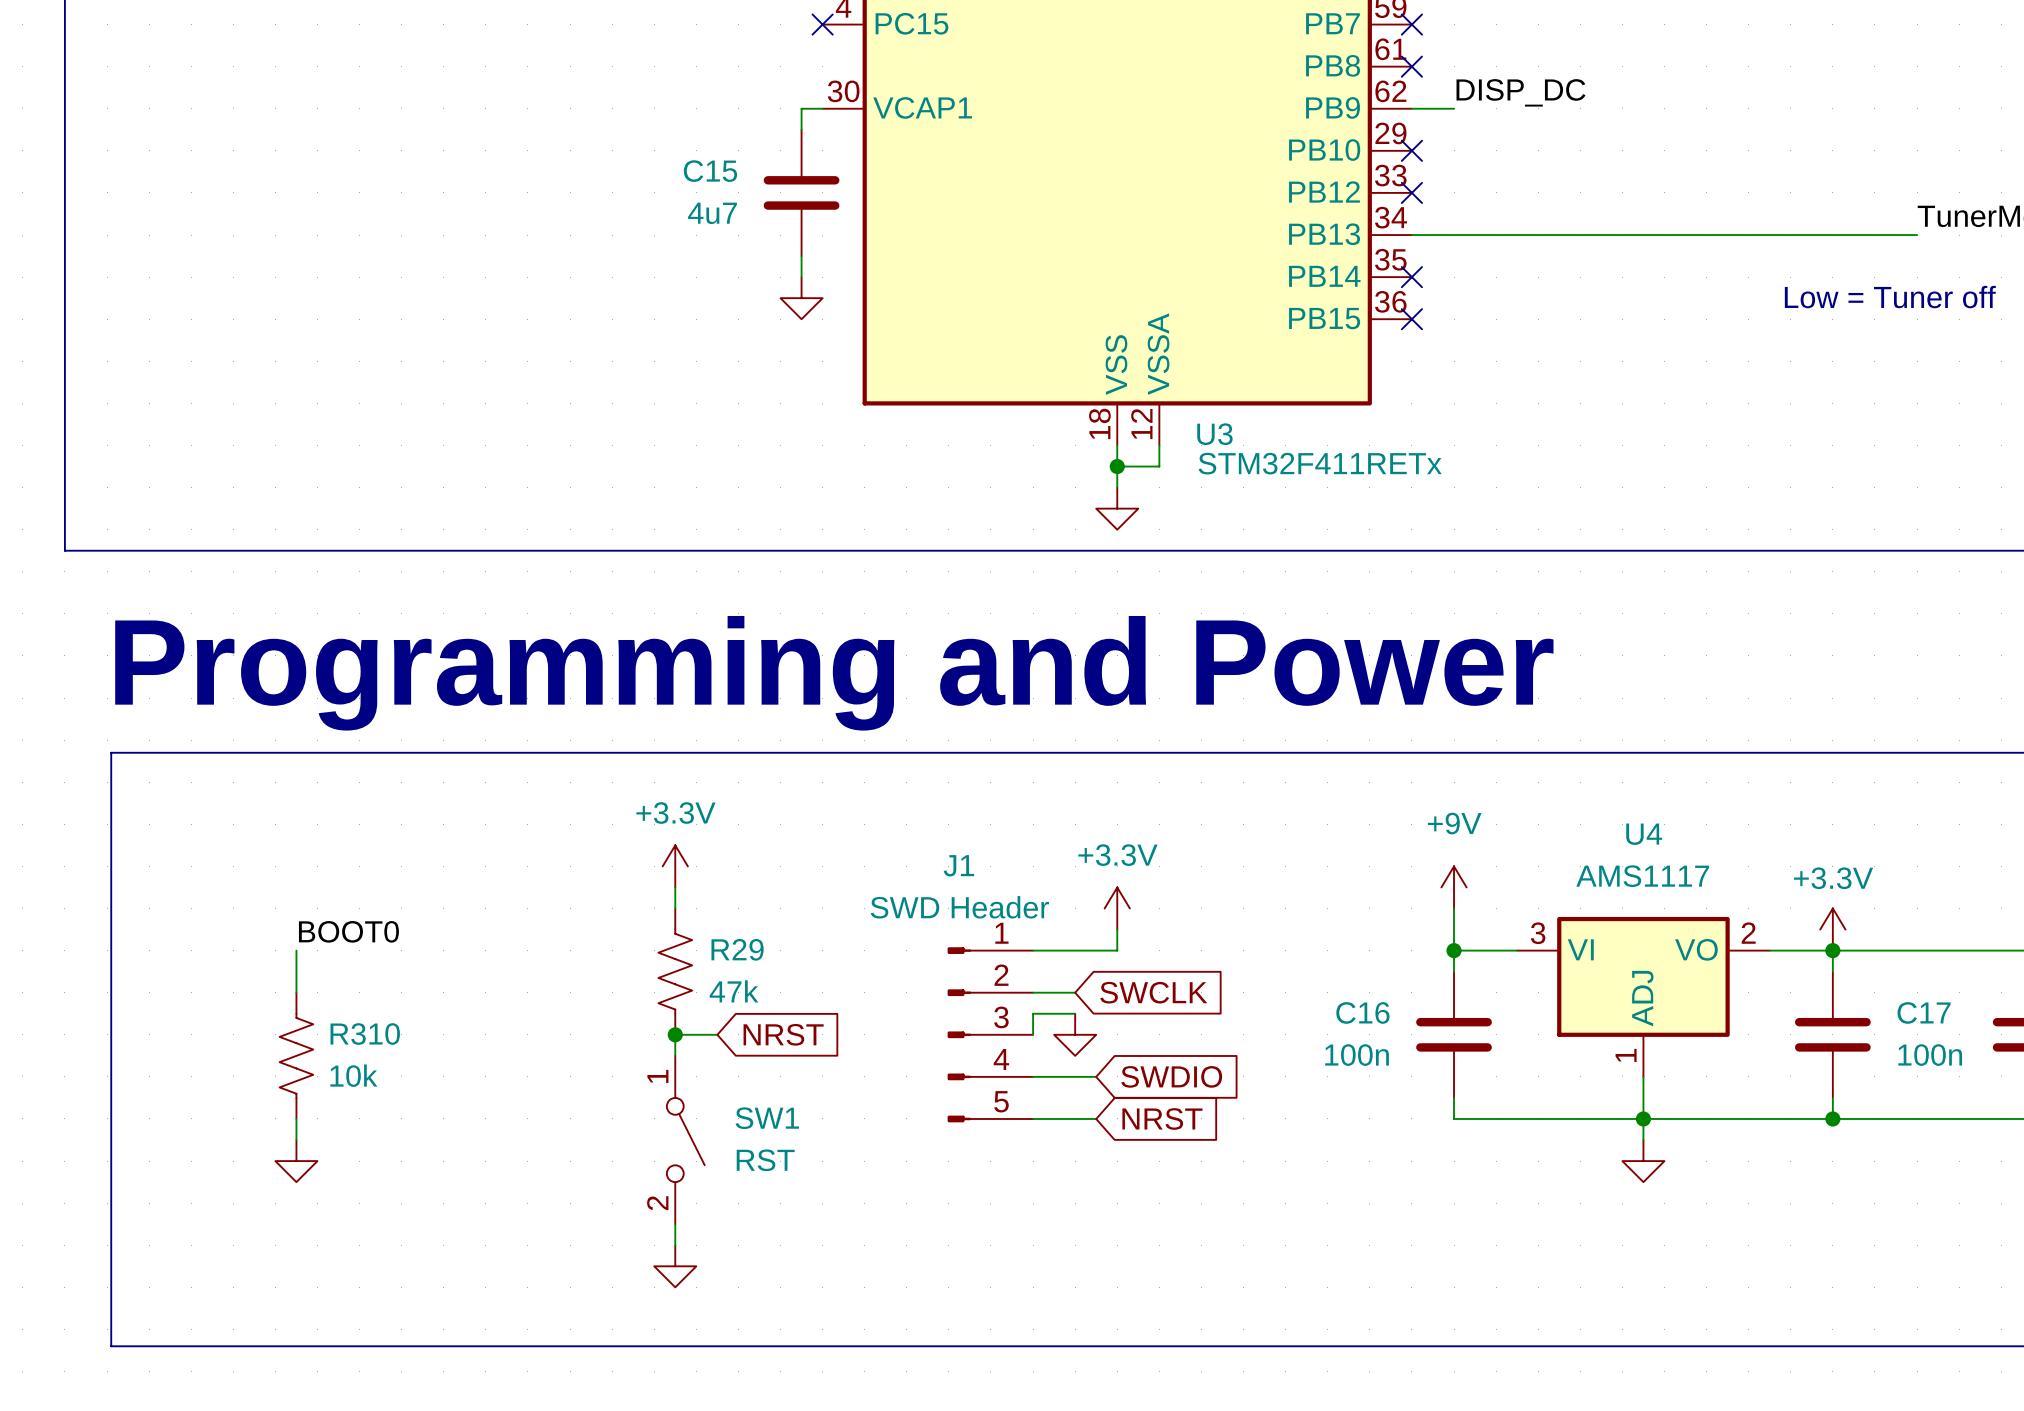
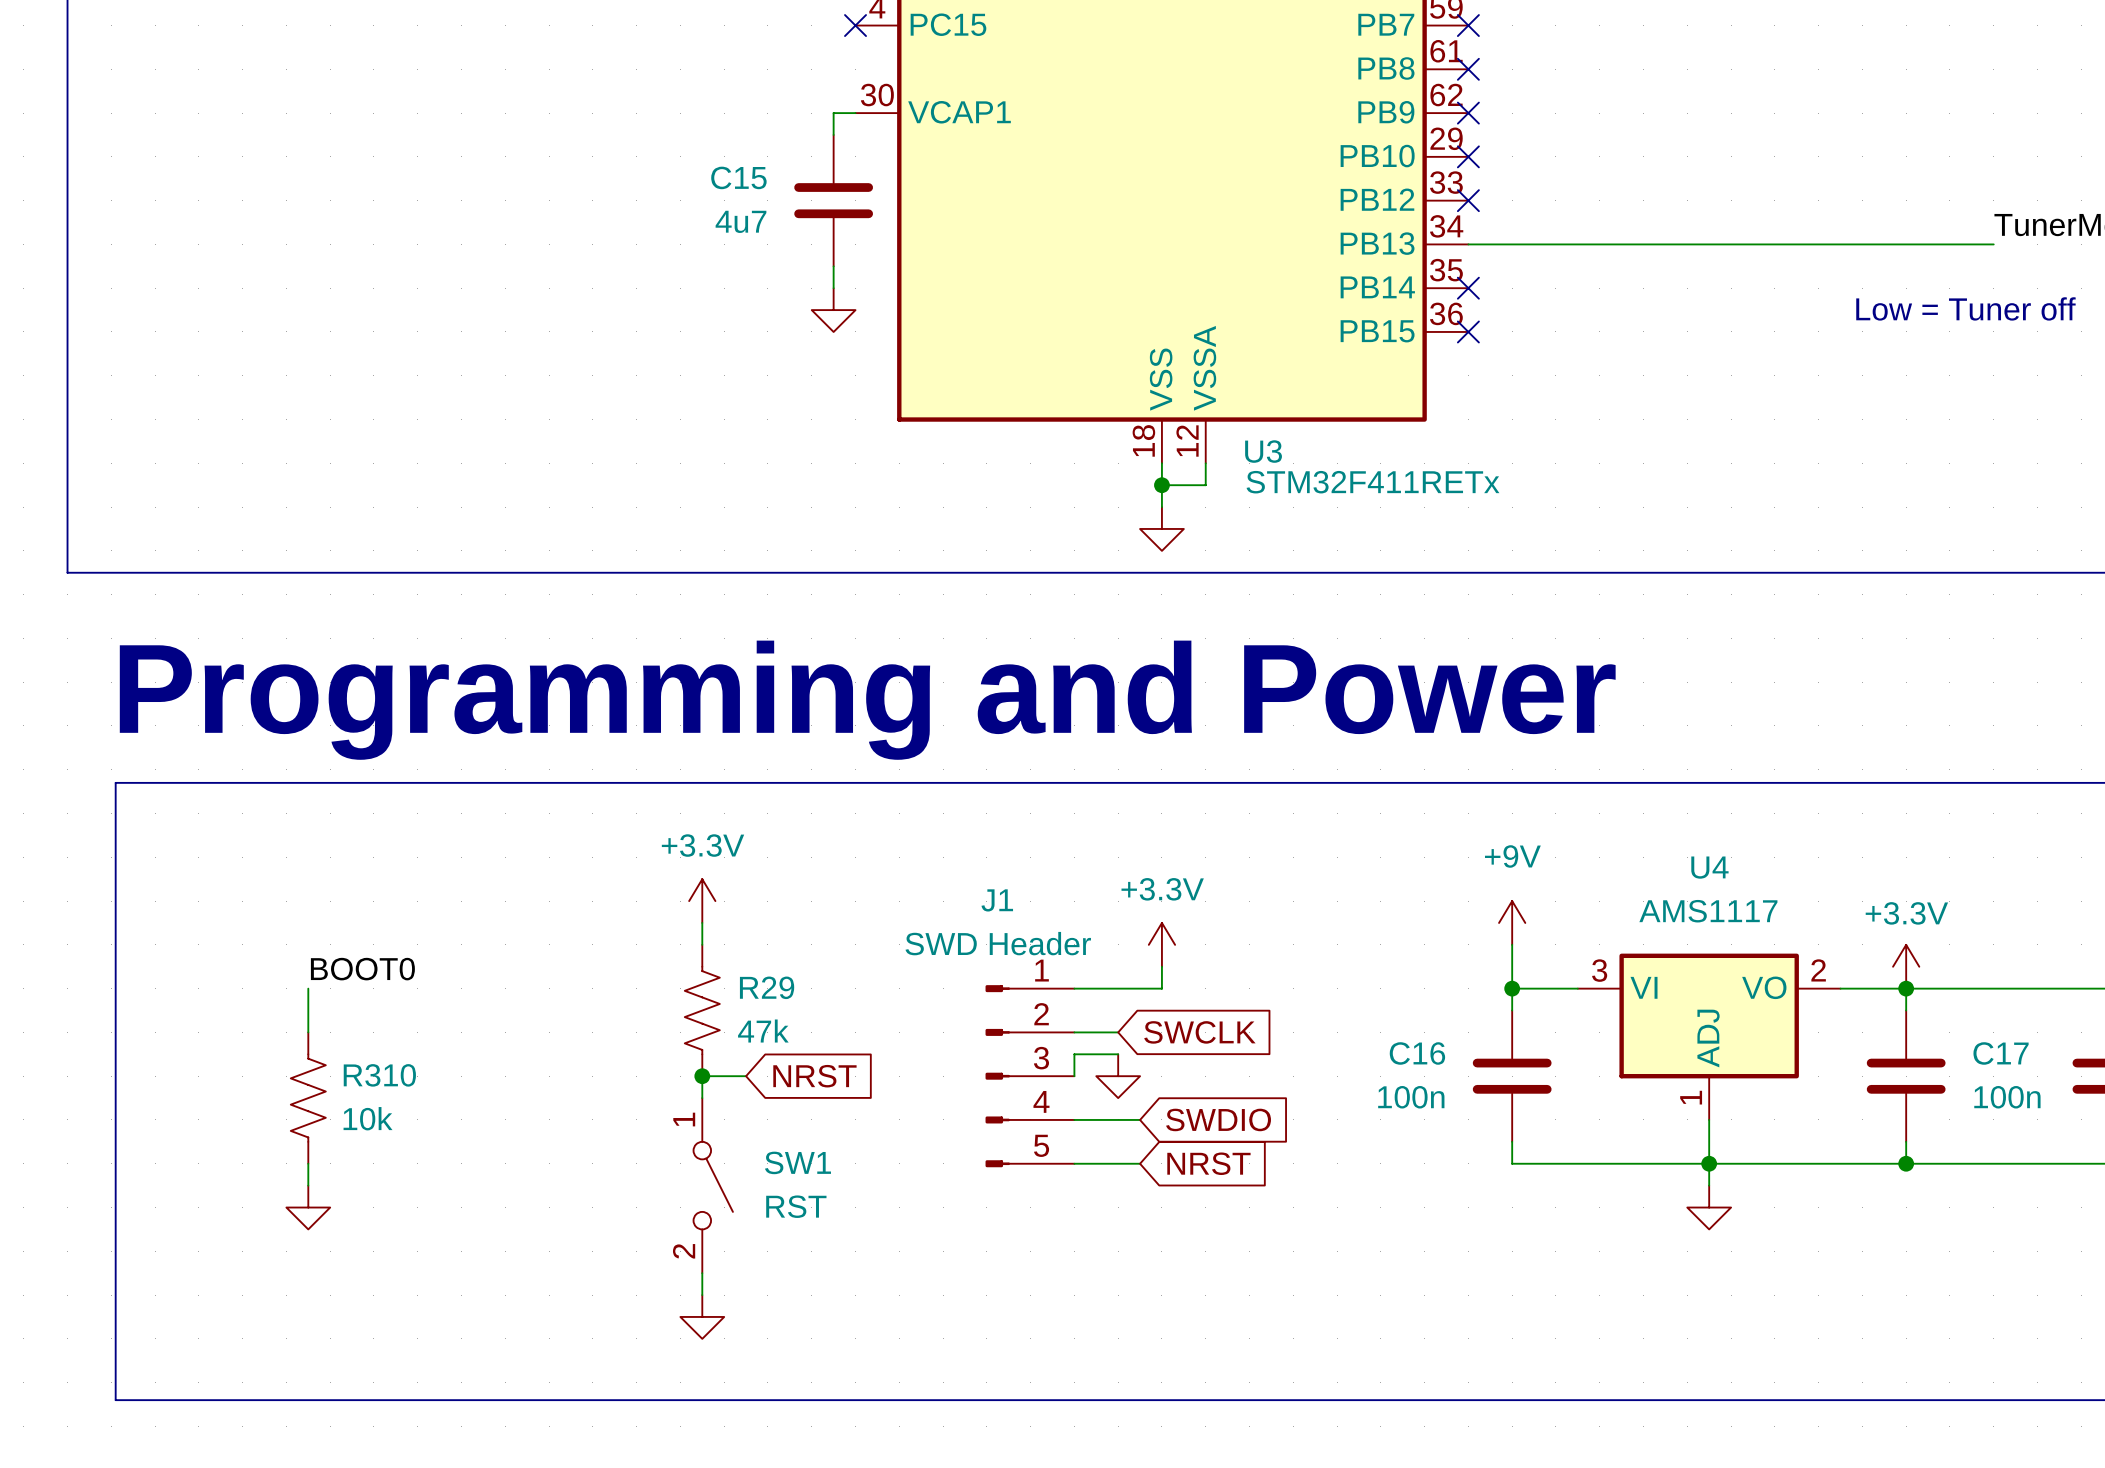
label: DISP_DC (1520, 92) -> none
wire: (1411, 108) (1454, 108) -> none
no-connect mark: none -> (1468, 113)

